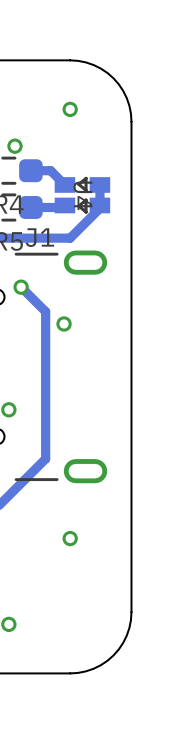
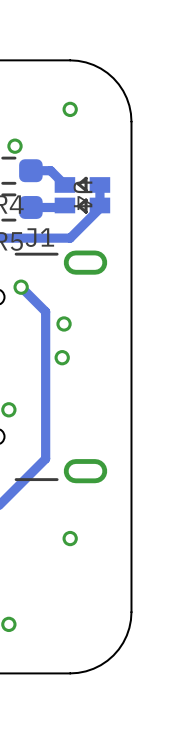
via: none -> (62, 357)

